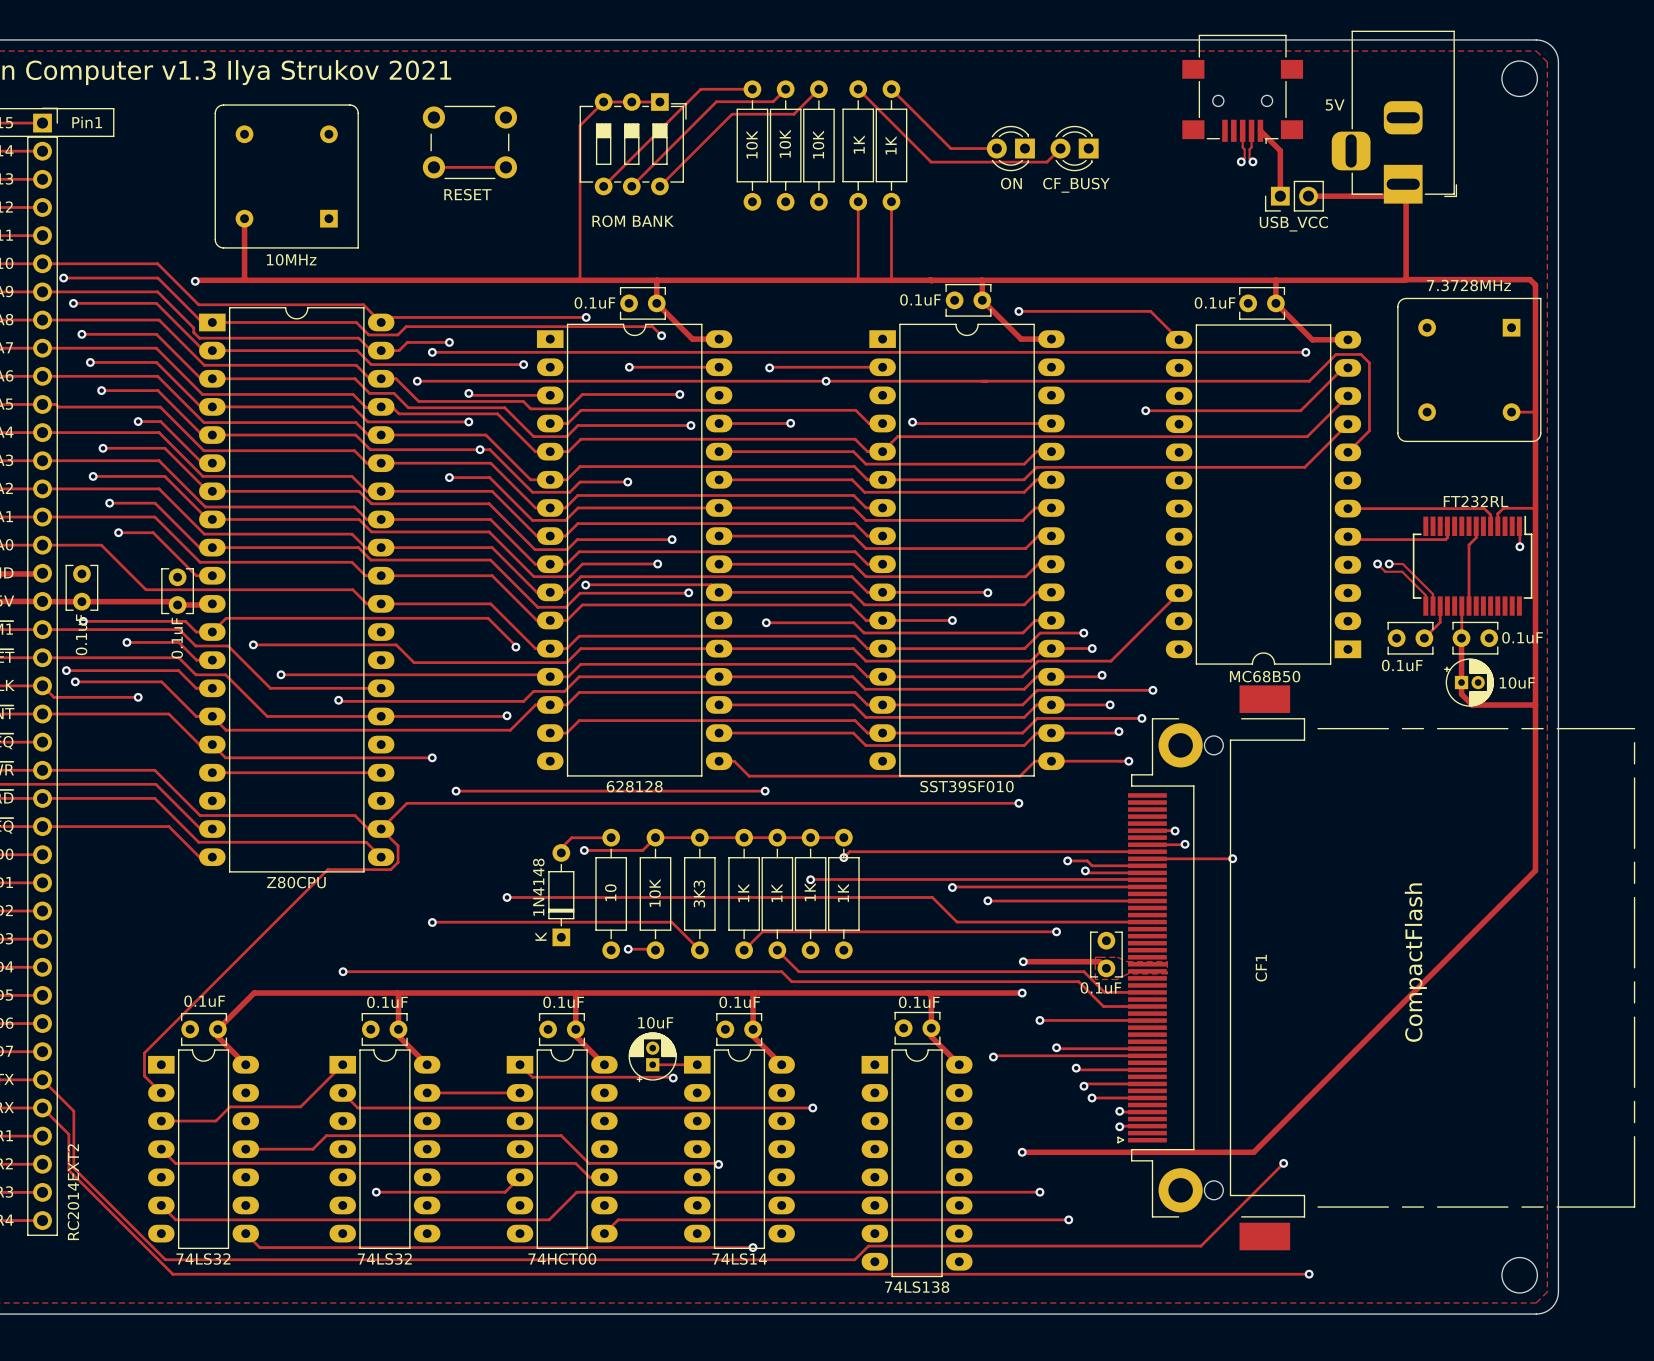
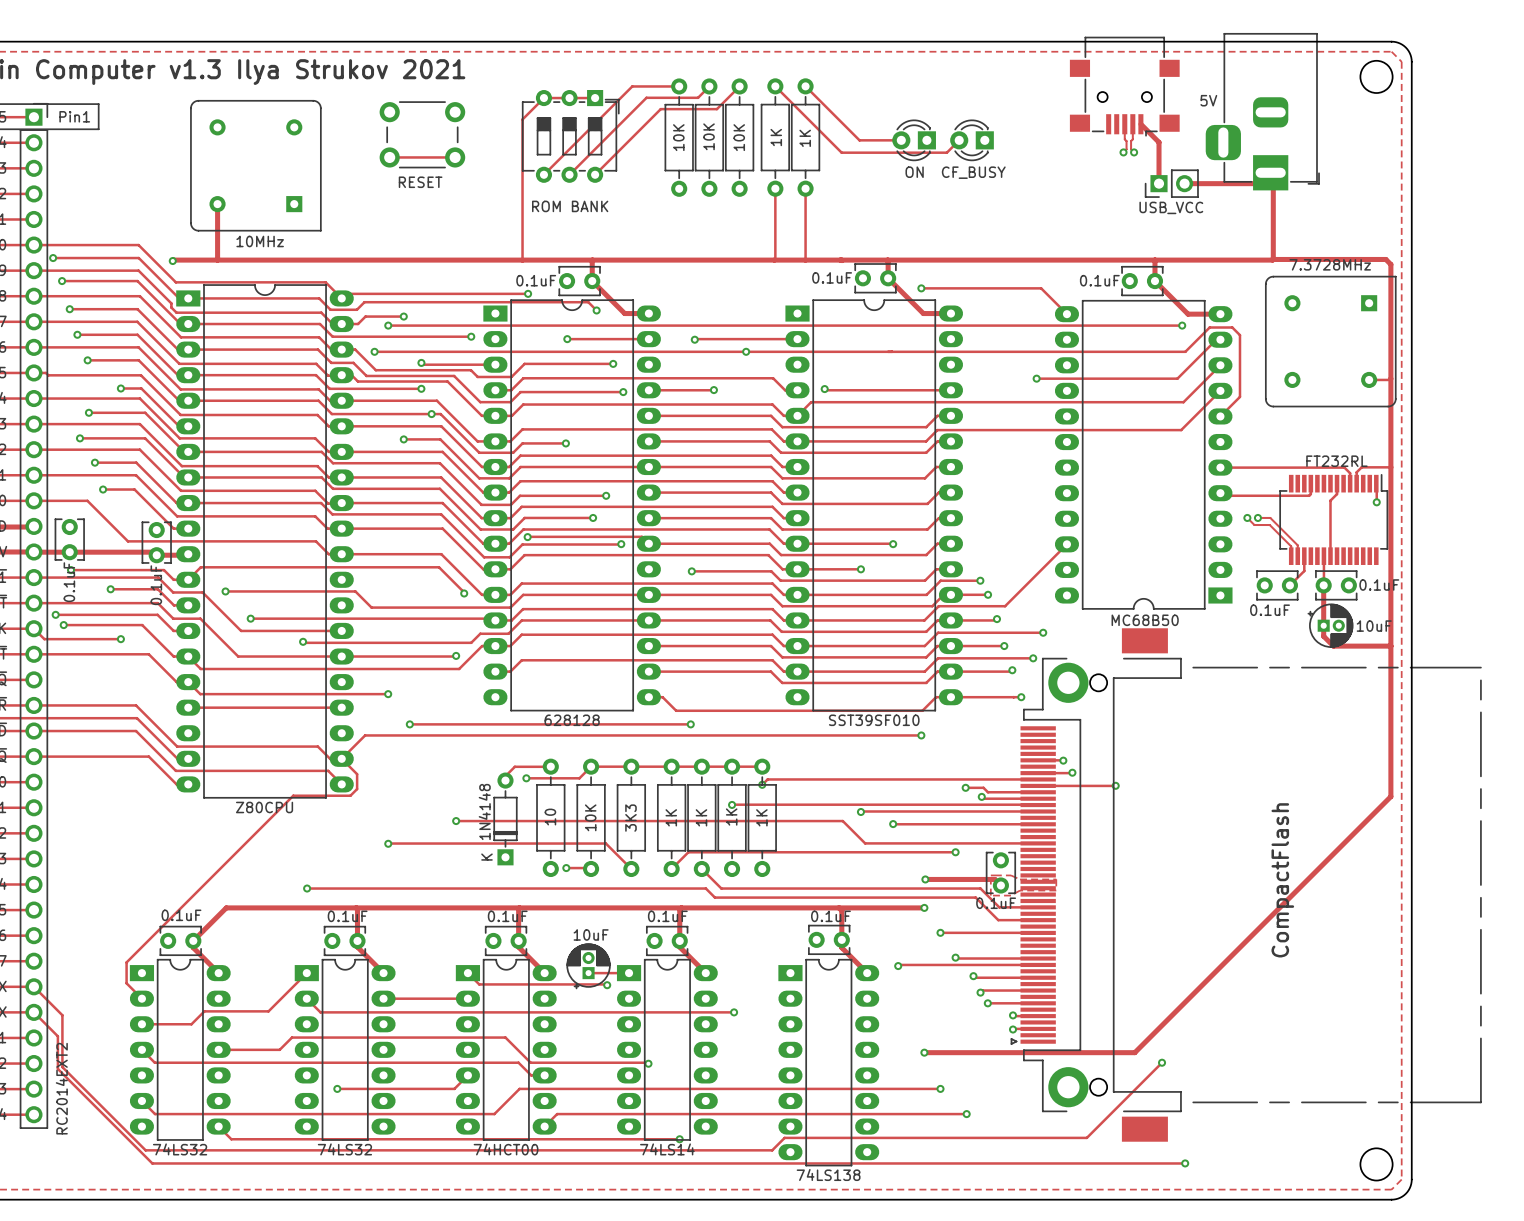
CF1 name: CF1 (1261, 968) -> none

